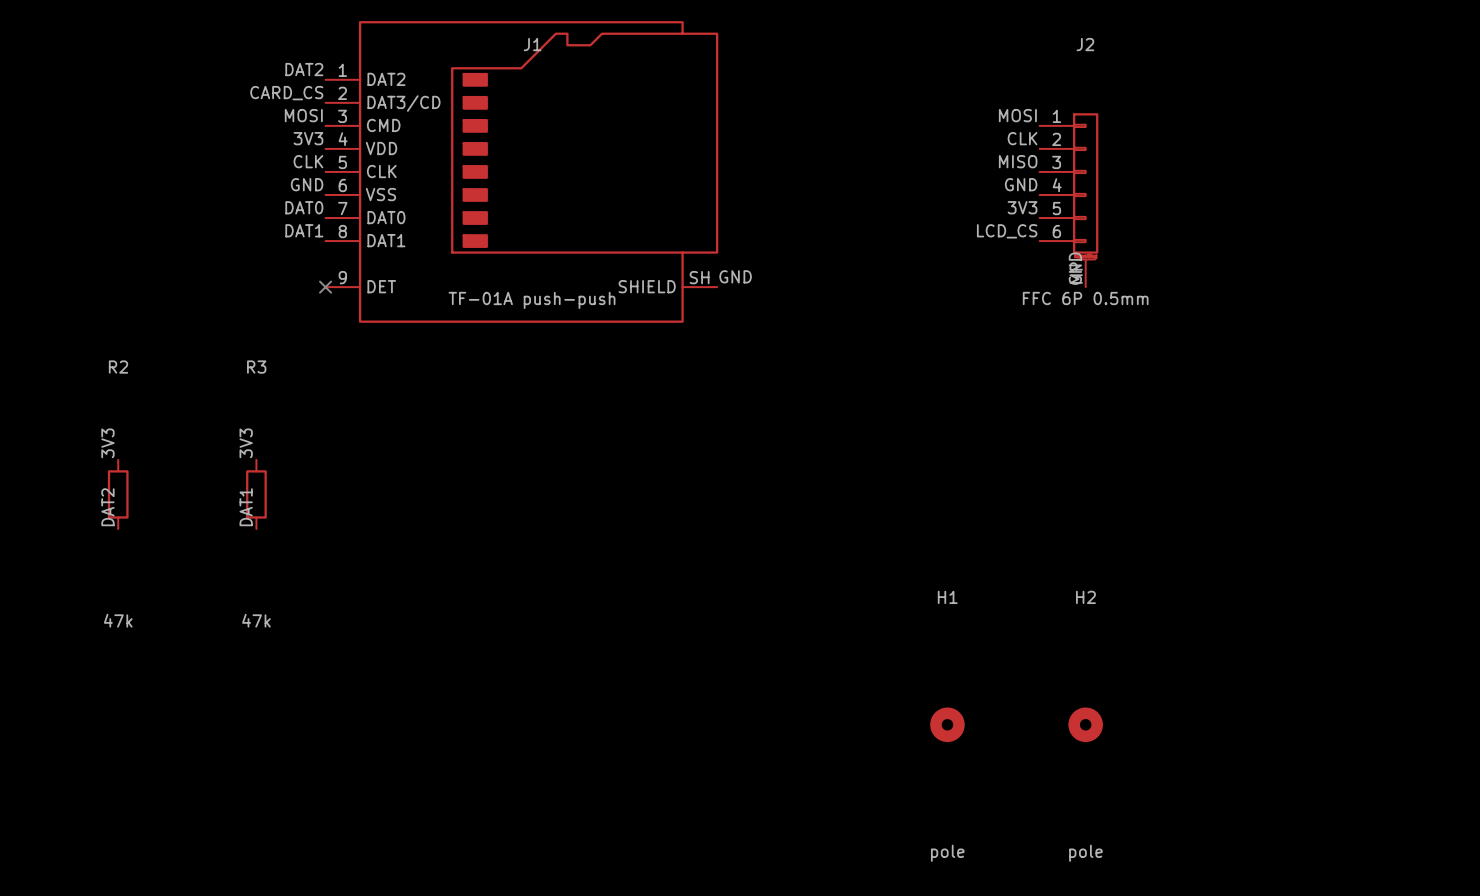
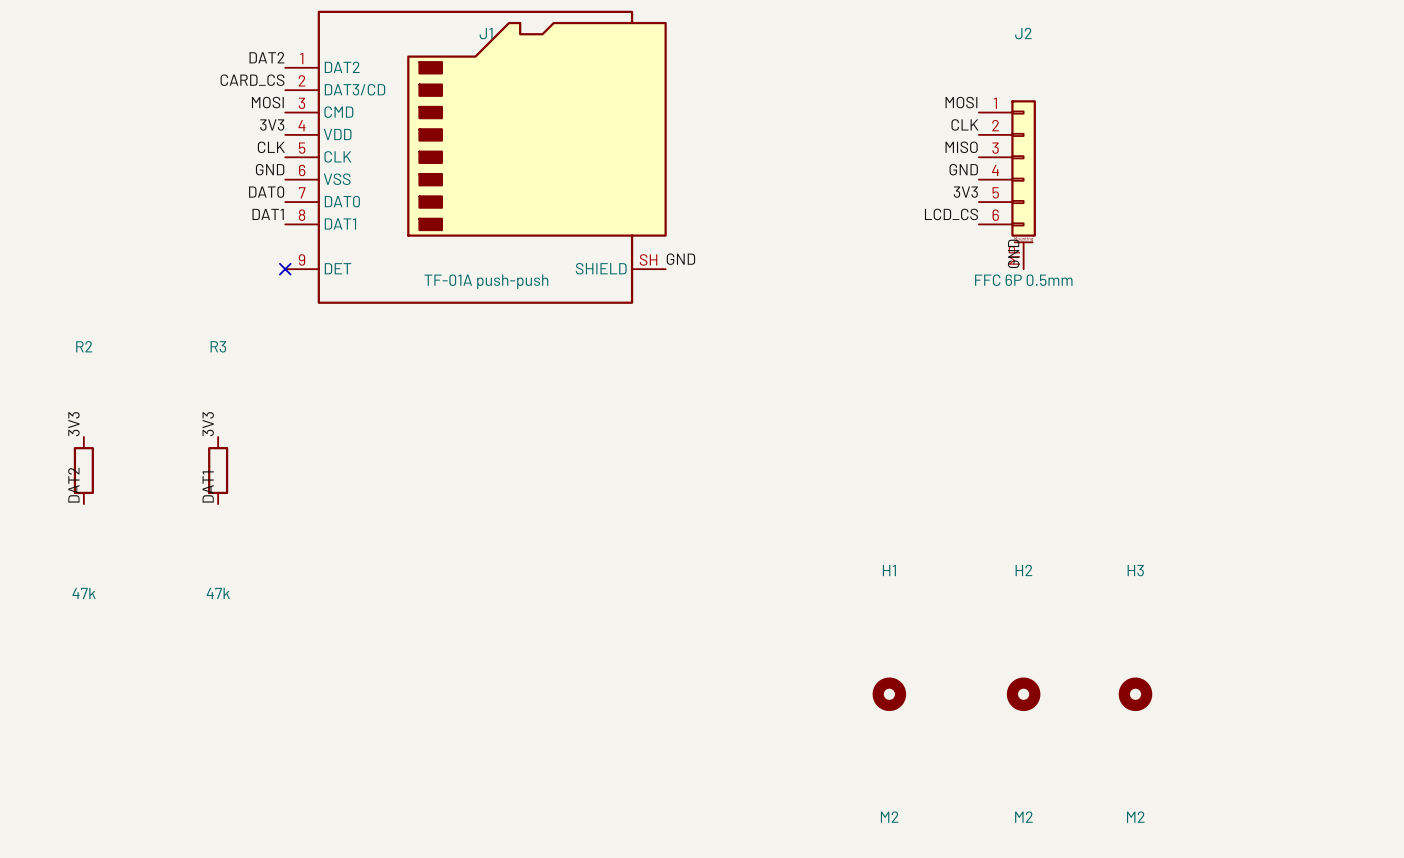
H3: none -> M2 (1135, 694)
H1 value: pole (947, 853) -> M2 (889, 817)
H2 value: pole (1085, 853) -> M2 (1023, 817)

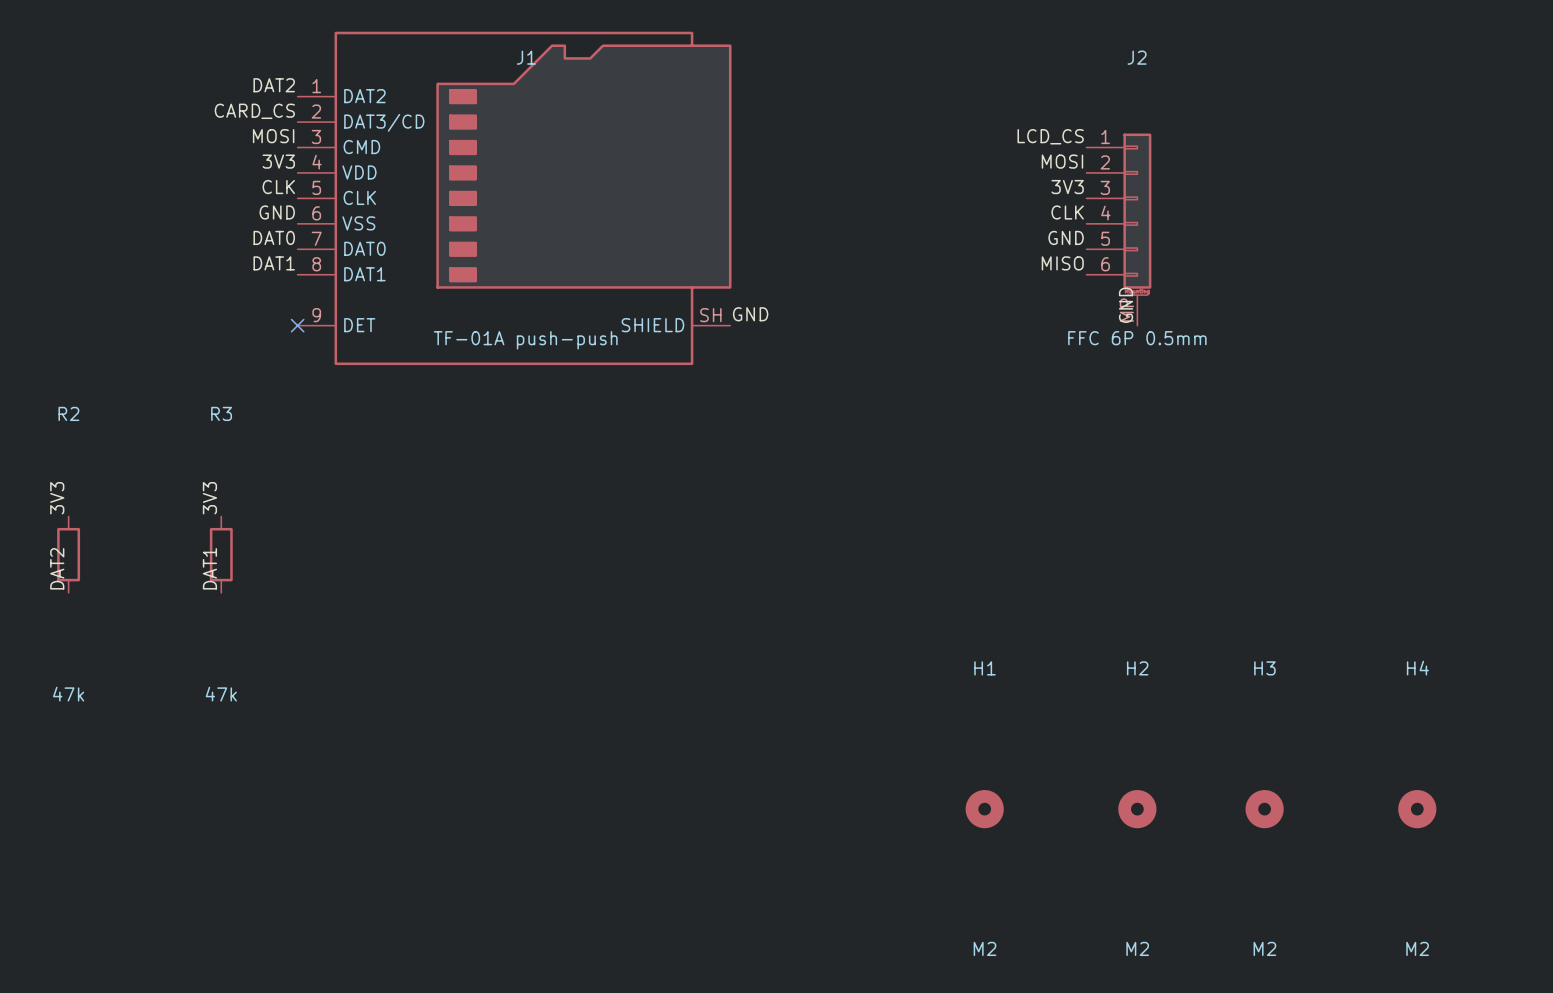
label: MOSI (961, 102) -> LCD_CS (1050, 136)
label: CLK (964, 124) -> MOSI (1062, 161)
label: MISO (961, 147) -> 3V3 (1067, 187)
label: GND (963, 169) -> CLK (1067, 212)
label: 3V3 (965, 192) -> GND (1066, 237)
label: LCD_CS (951, 214) -> MISO (1062, 263)
H4: none -> M2 (1417, 809)

